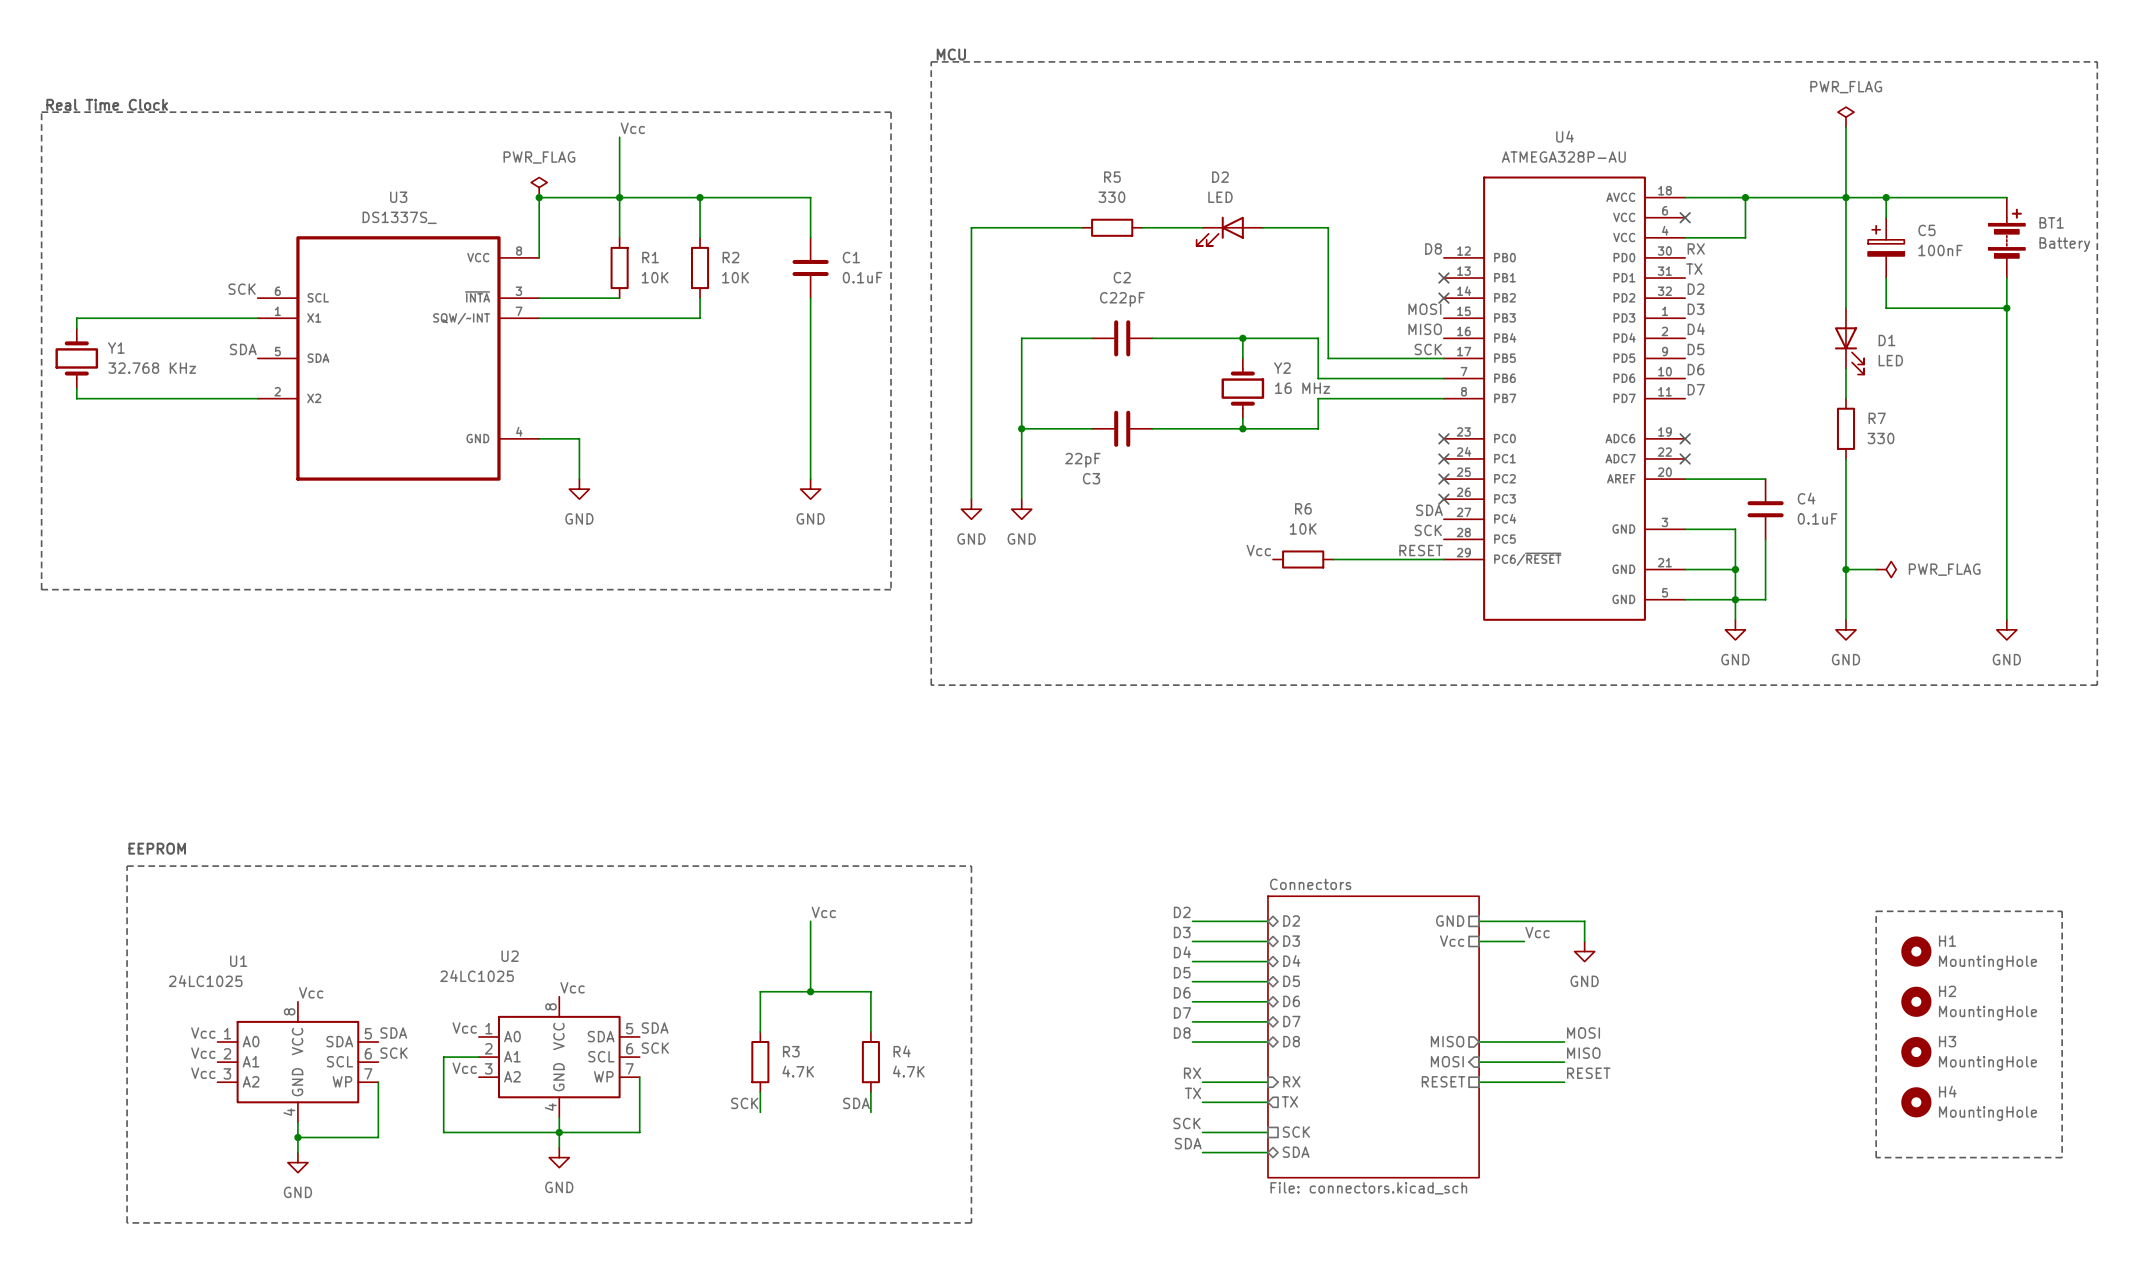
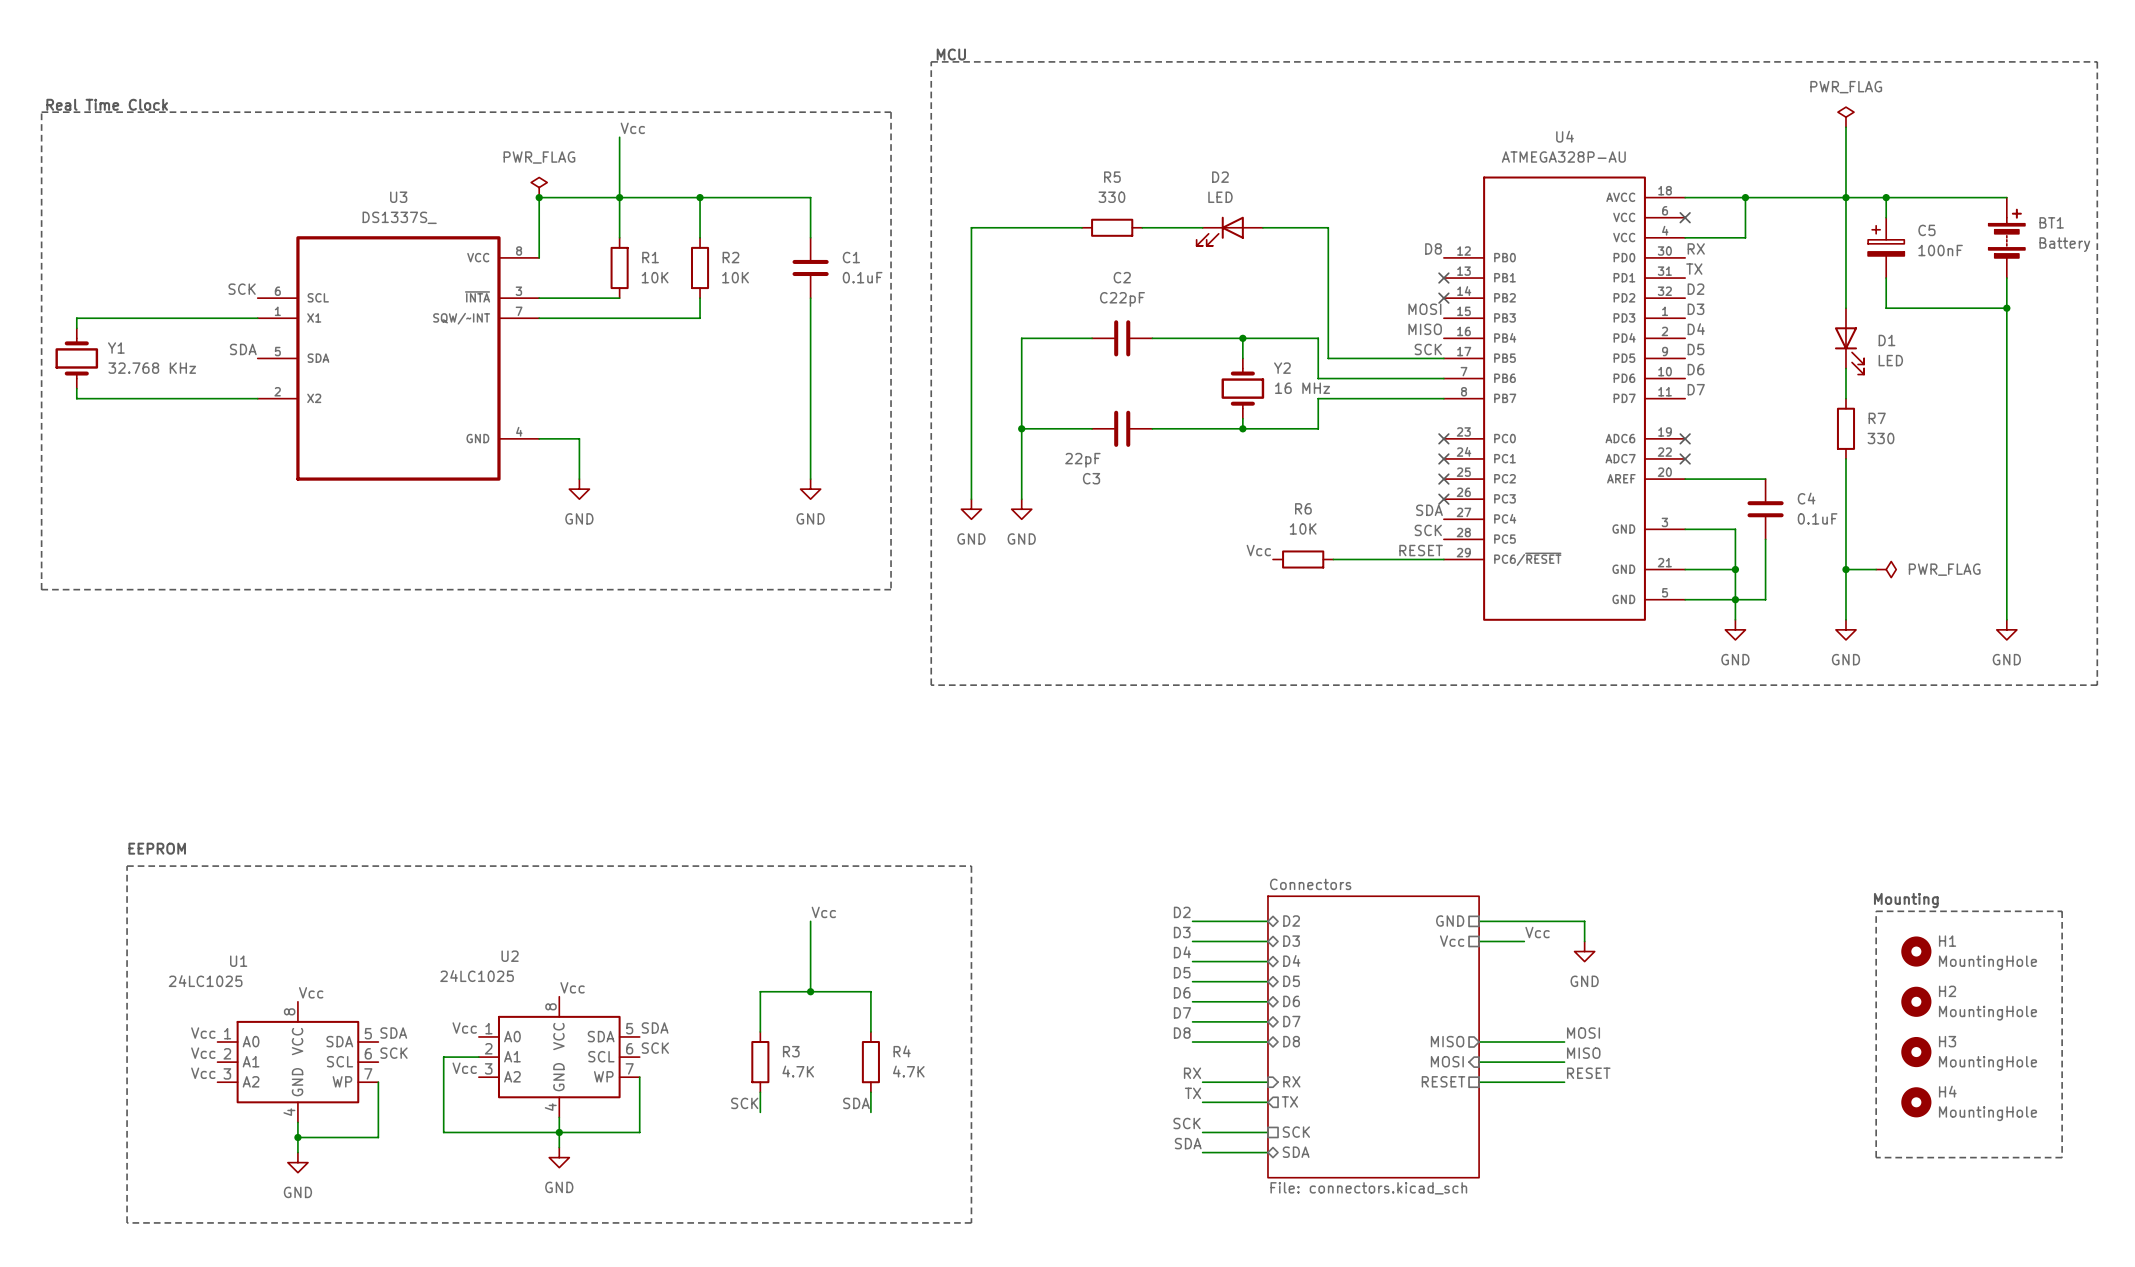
text: none -> Mounting (1906, 900)

